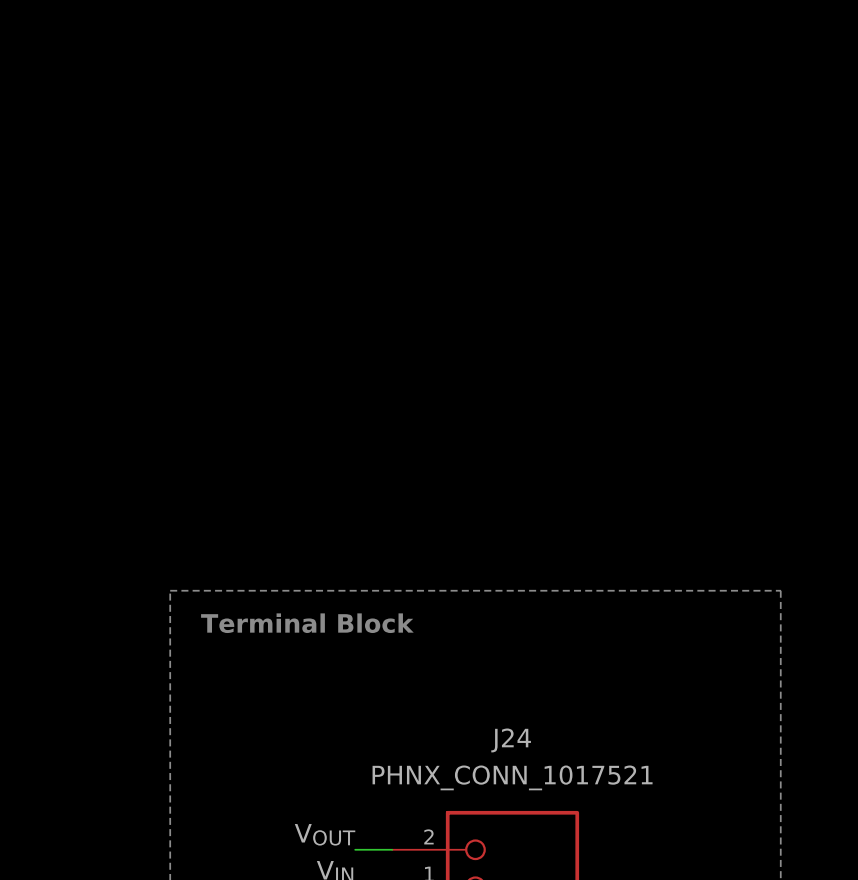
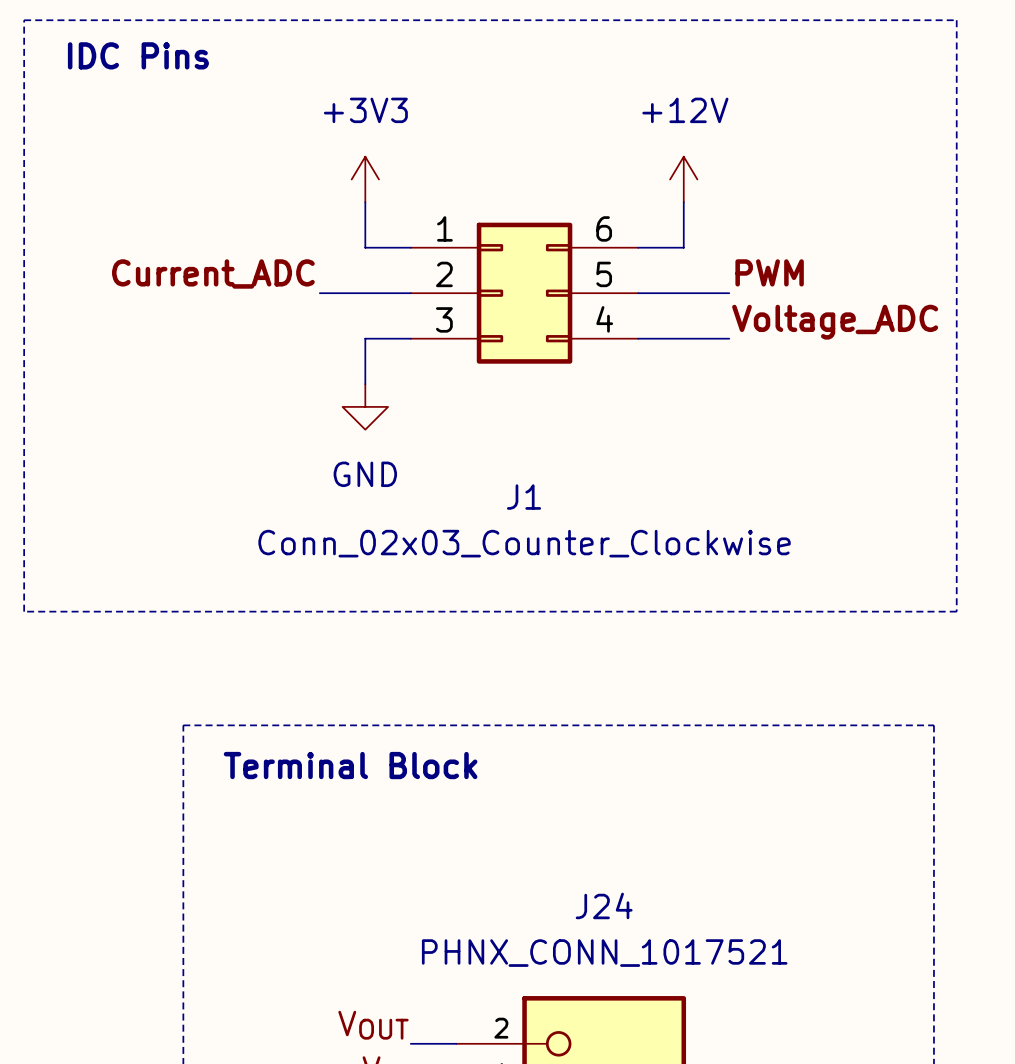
line: none -> (24, 20) (956, 20) (956, 611) (24, 611) (24, 20)
text: none -> IDC Pins (138, 55)
power symbol: none -> +3V3 (365, 179)
power symbol: none -> +12V (683, 179)
wire: none -> (365, 202) (365, 247) (410, 247)
wire: none -> (683, 202) (683, 247) (638, 247)
label: none -> PWM (769, 272)
label: none -> Current_ADC (213, 273)
wire: none -> (319, 293) (410, 293)
J1: none -> Conn_02x03_Counter_Clockwise (524, 293)
wire: none -> (638, 293) (729, 293)
label: none -> Voltage_ADC (835, 322)
wire: none -> (410, 338) (365, 338) (365, 384)
wire: none -> (638, 338) (729, 338)
power symbol: none -> GND (365, 406)

